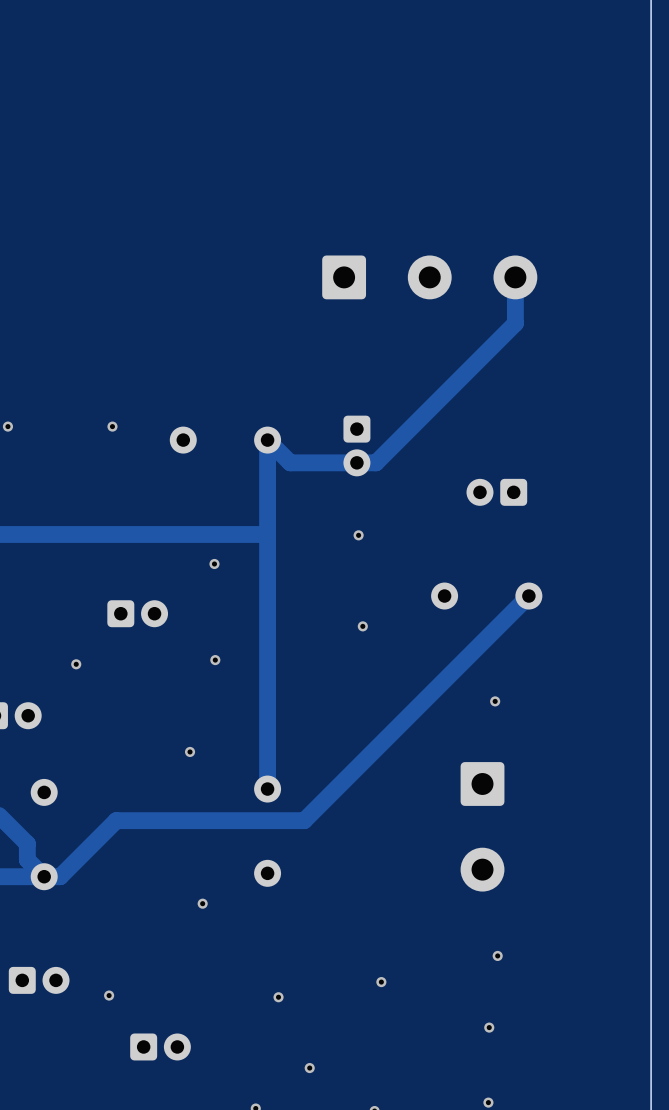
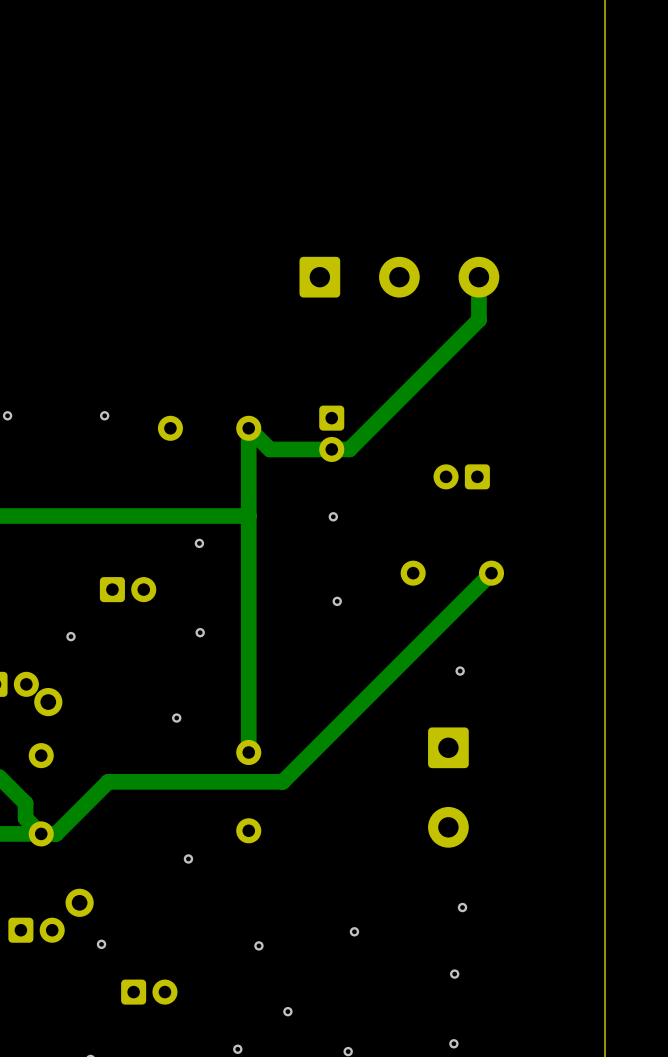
part: none -> (48, 702)
part: none -> (79, 902)

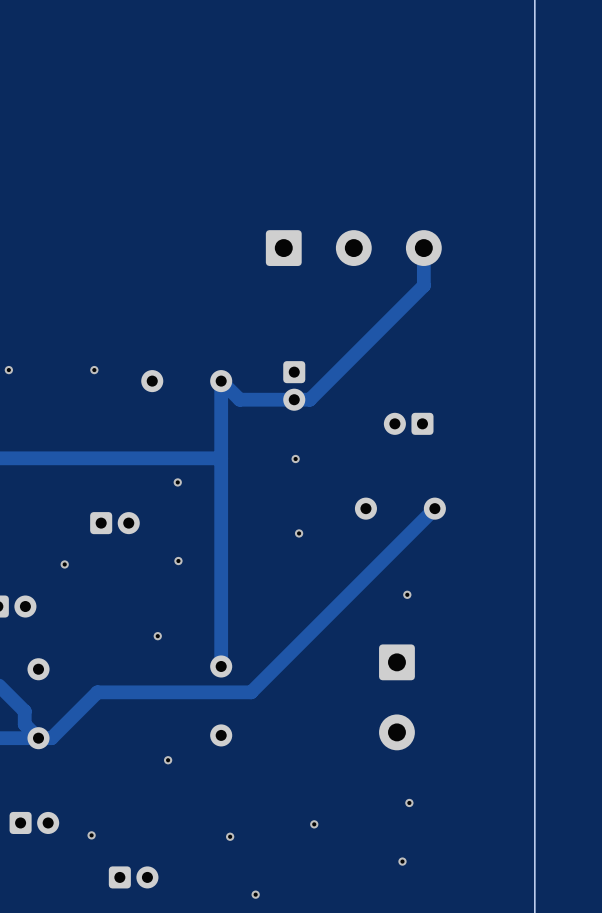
part: (48, 702) -> none
part: (79, 902) -> none

